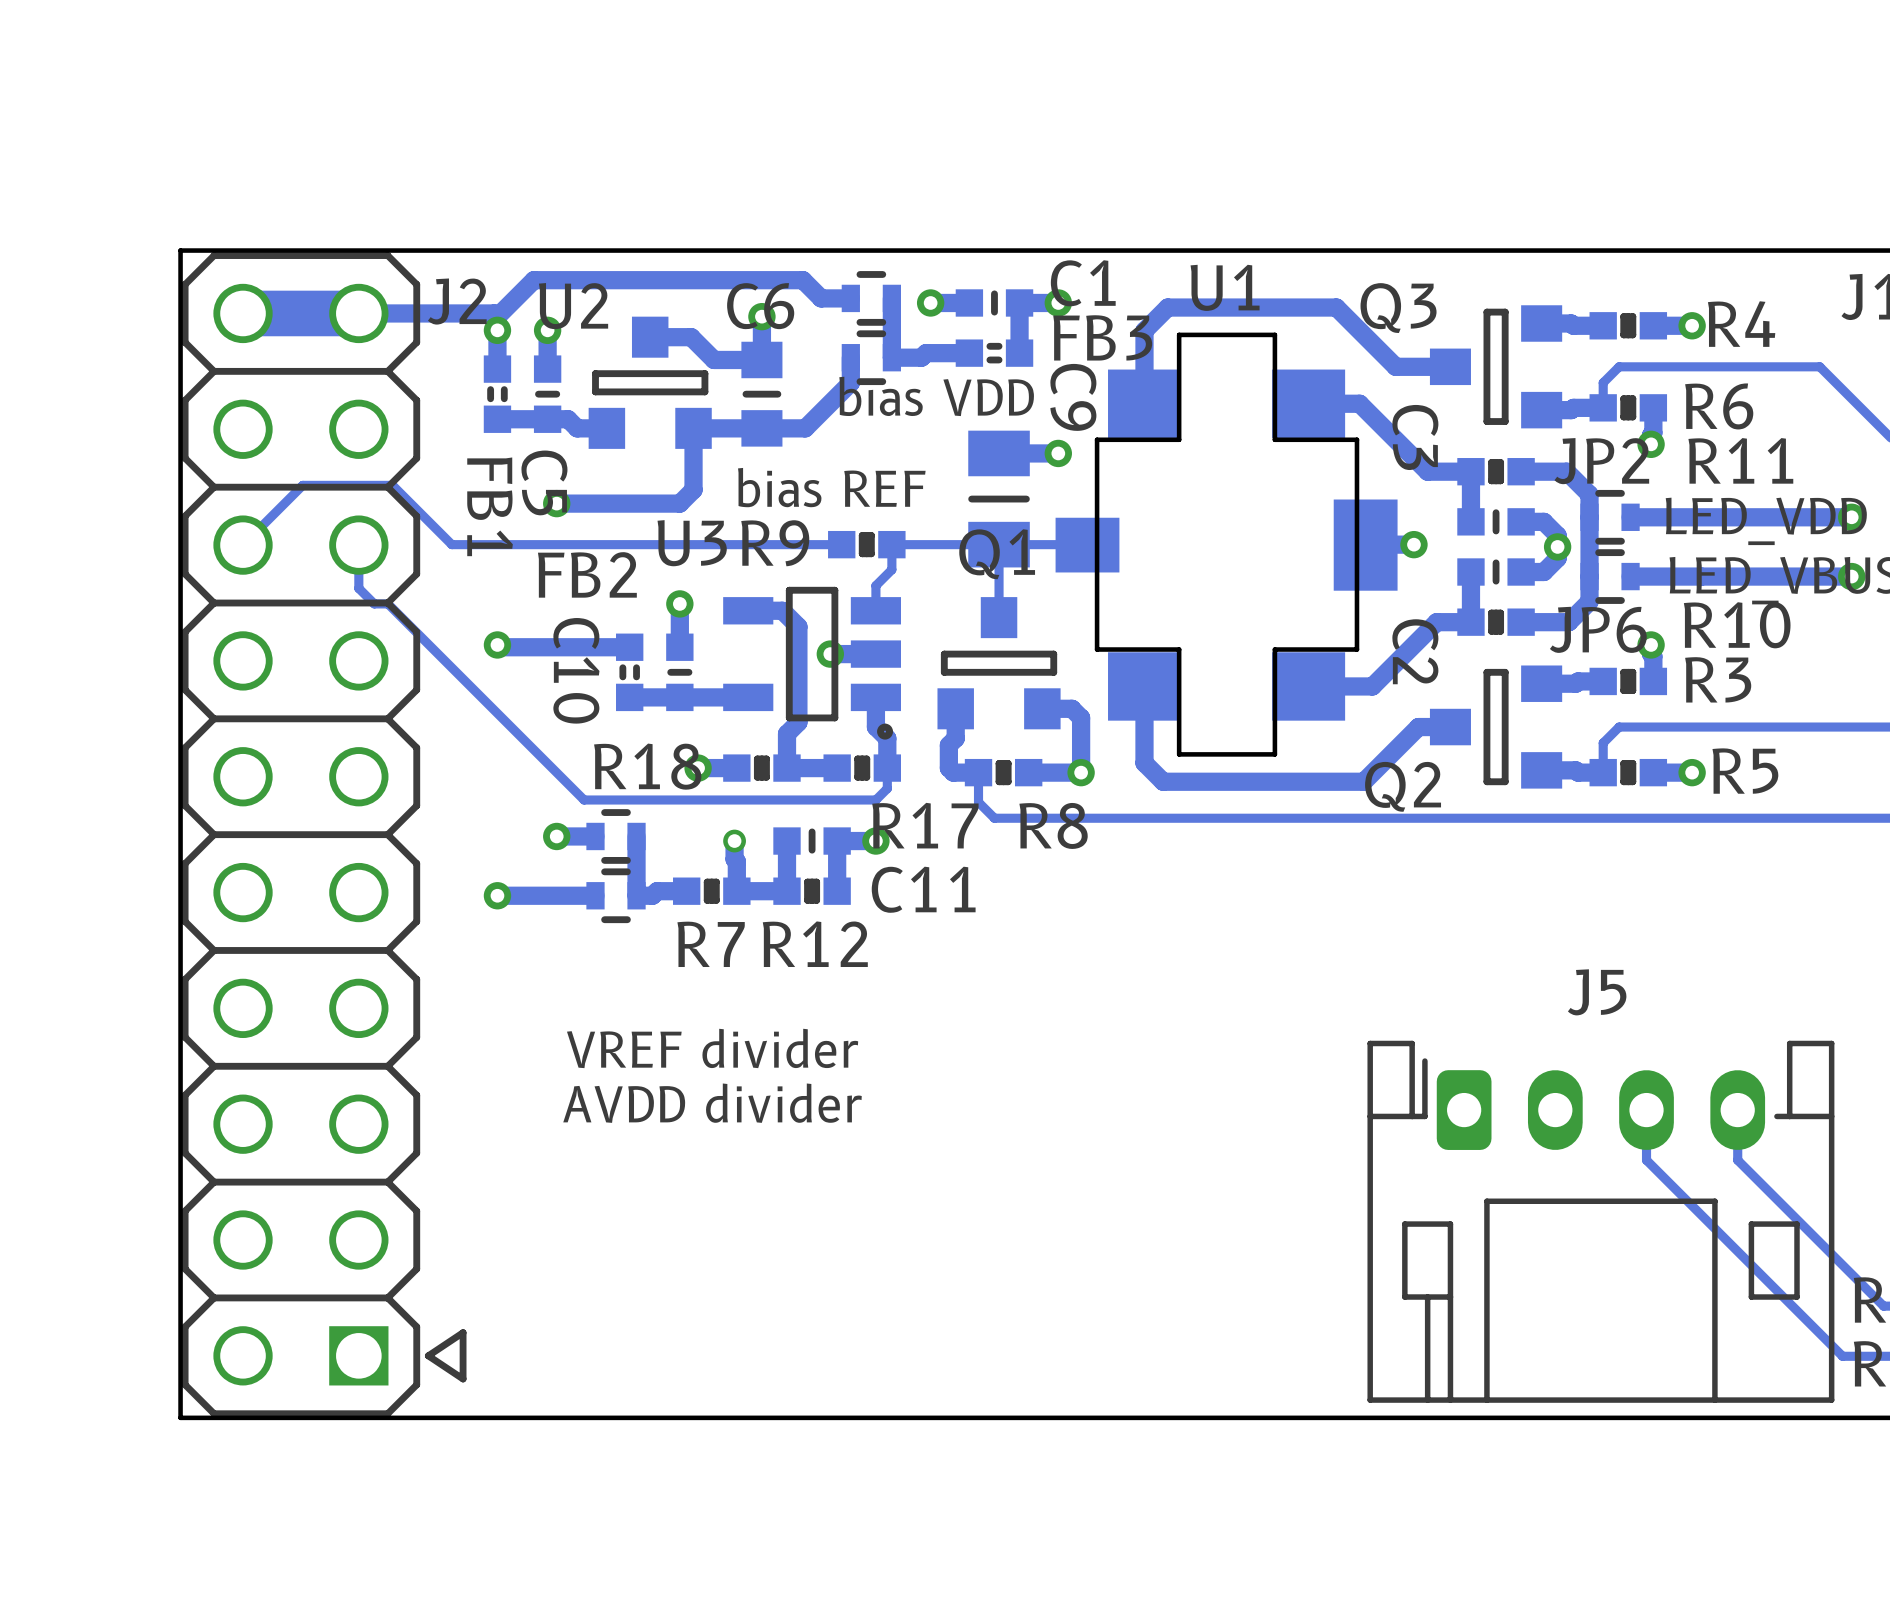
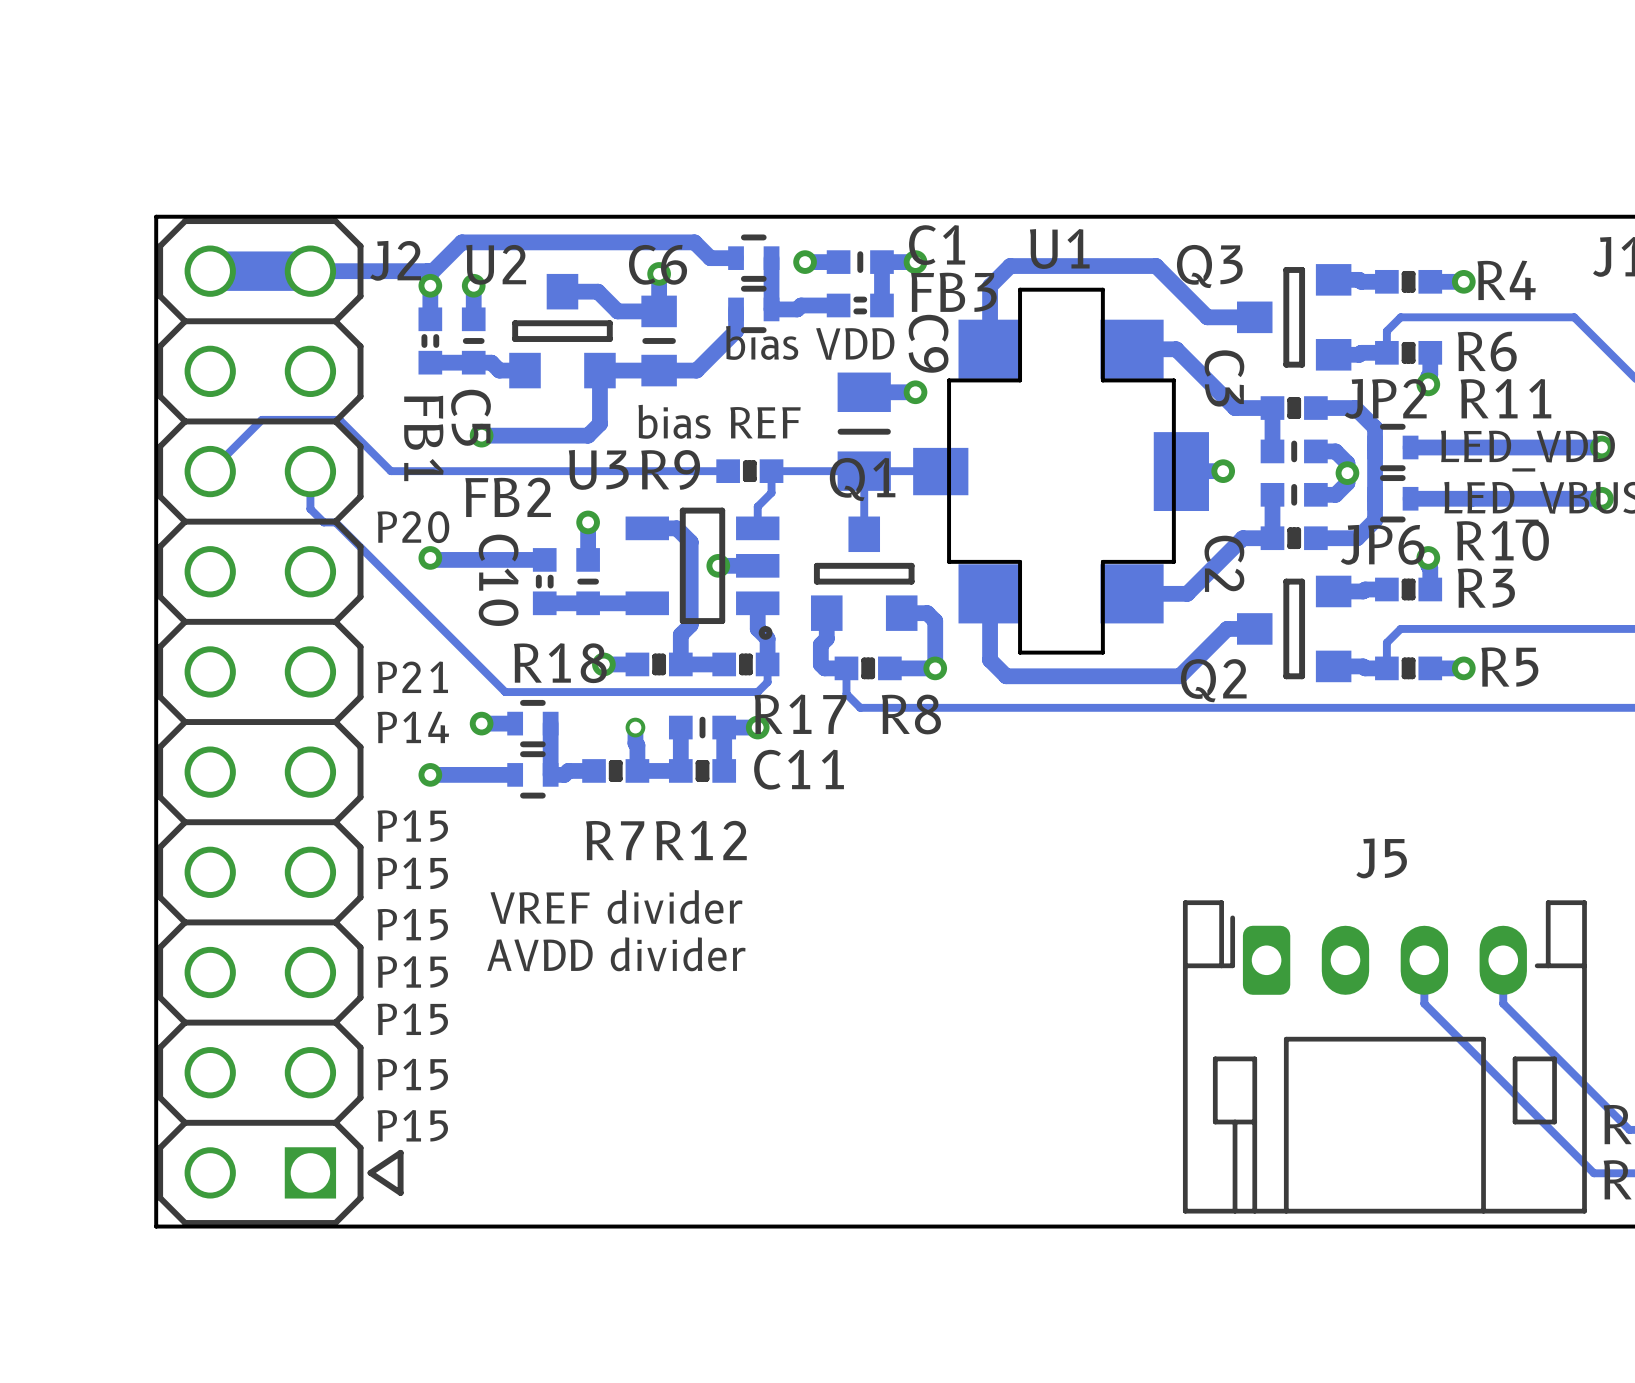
text: none -> P20 (413, 527)
text: none -> P21 (412, 677)
text: none -> P14 (413, 727)
R7 name position: R7 (711, 944) -> R7 (615, 840)
R12 name position: R12 (815, 944) -> R12 (701, 840)
text: none -> P15 (412, 825)
text: none -> P15 (412, 873)
text: none -> P15 (412, 924)
text: none -> P15 (412, 971)
text: none -> P15 (412, 1019)
text: none -> P15 (412, 1074)
text: none -> P15 (412, 1125)

